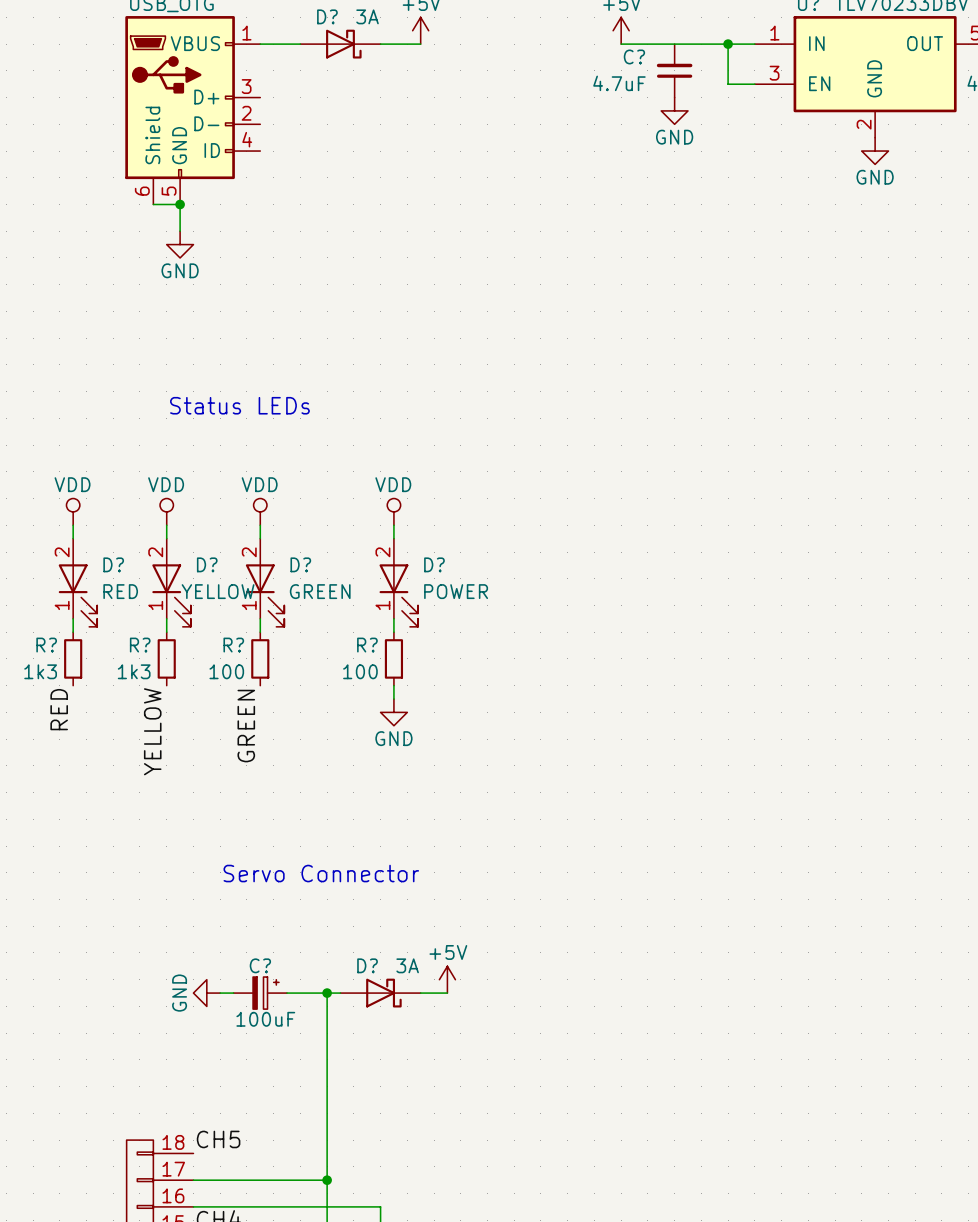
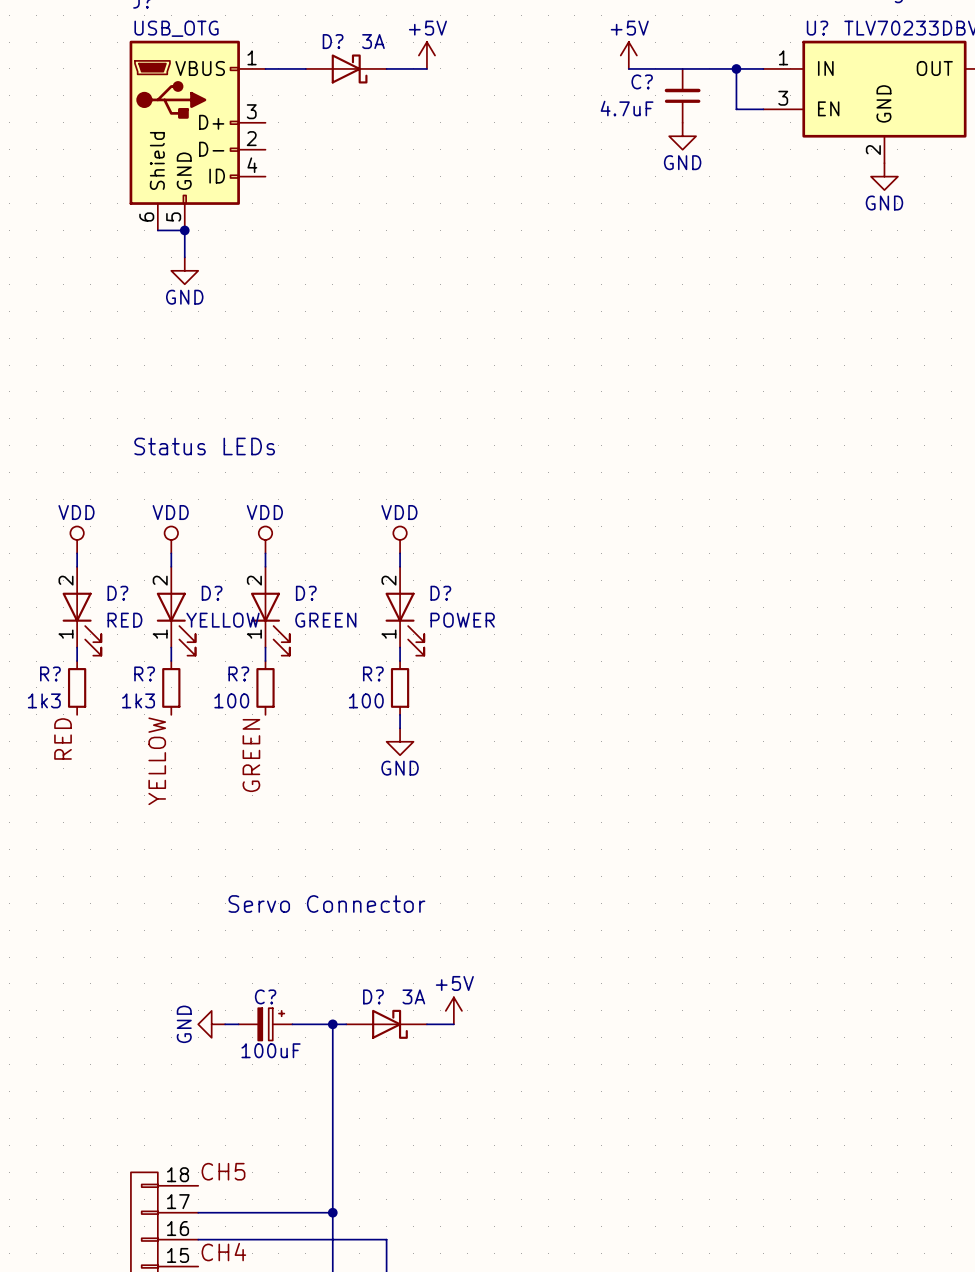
text position: Status LEDs (239, 405) -> Status LEDs (204, 446)

